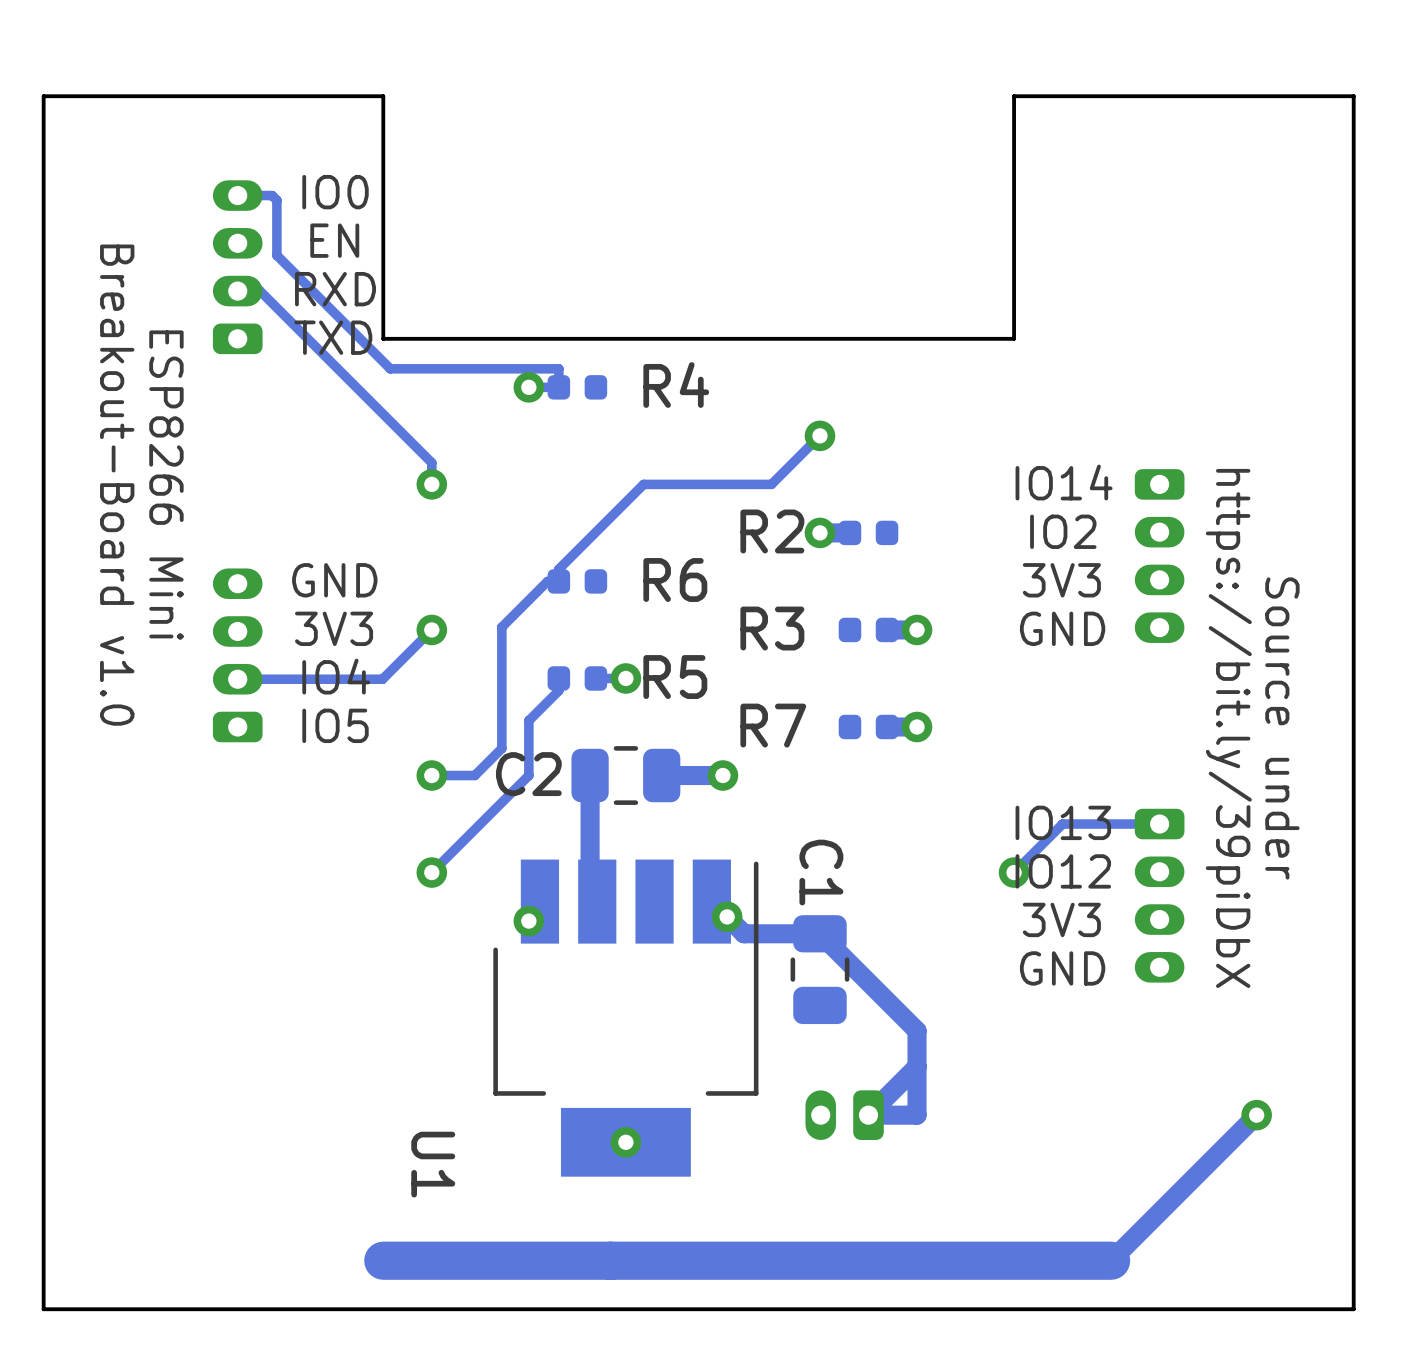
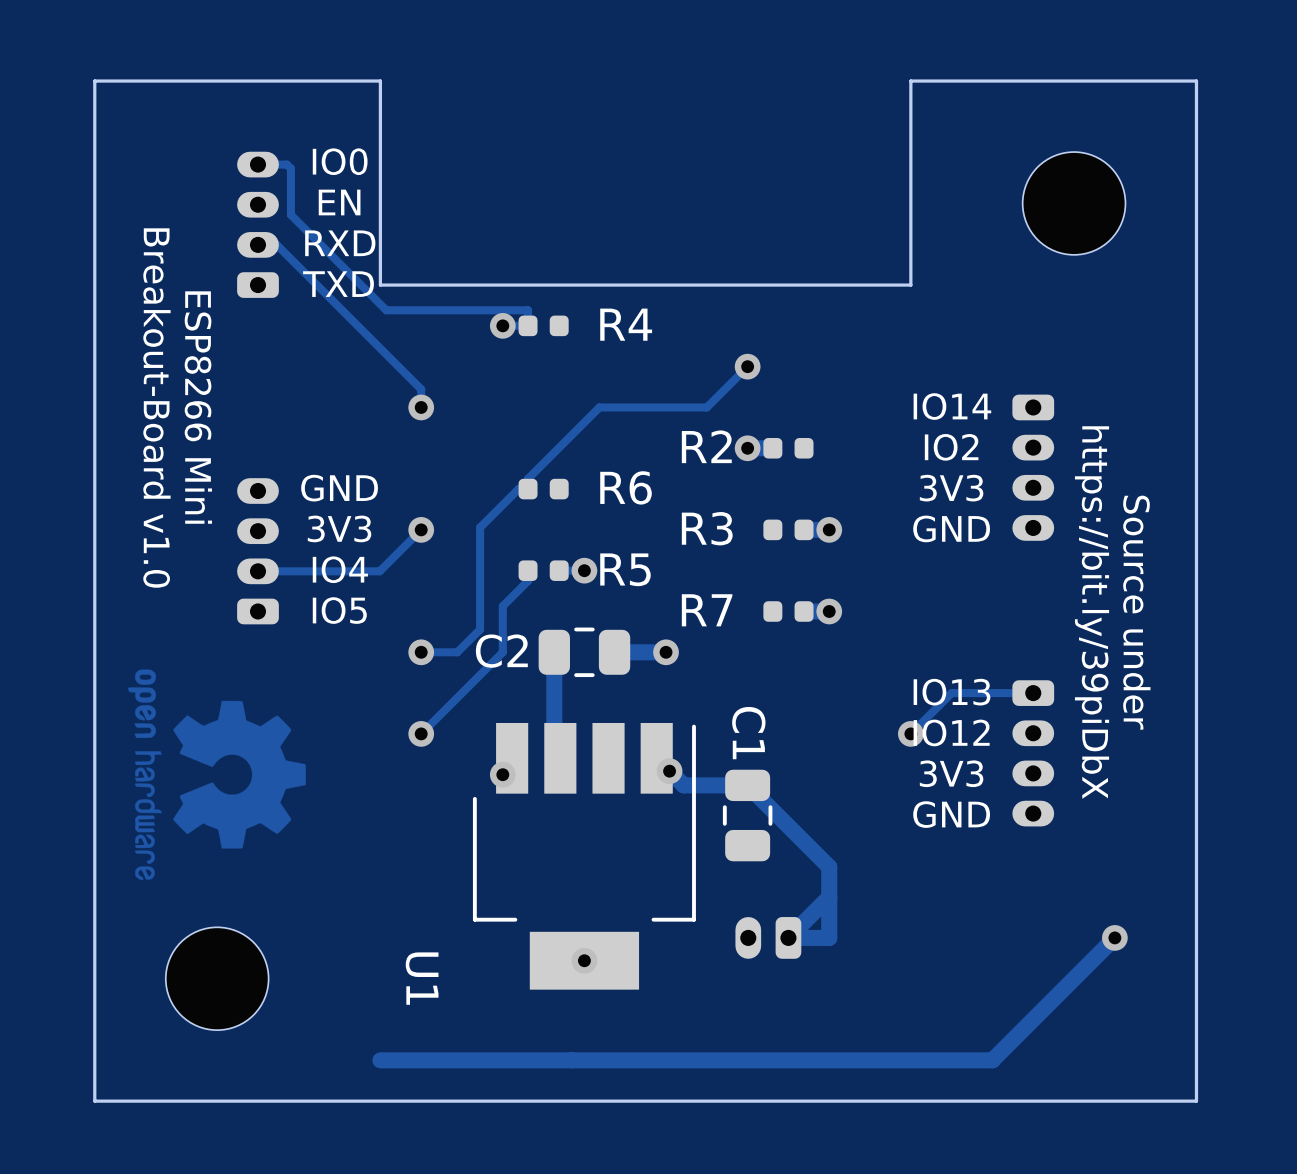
part: none -> (1074, 203)
drawing: none -> [128, 669, 306, 880]
part: none -> (217, 978)
track width: thick (1111, 1260) (383, 1260) -> thin (992, 1060) (380, 1060)

